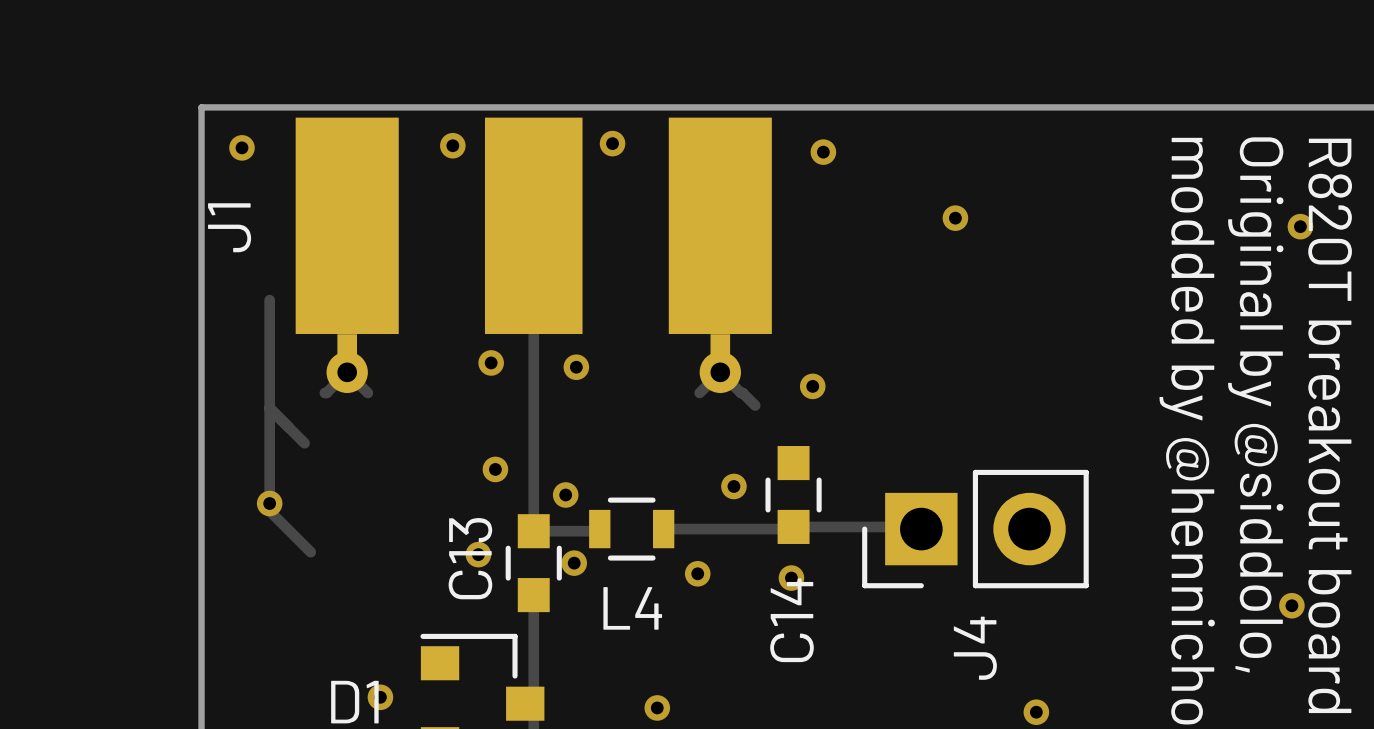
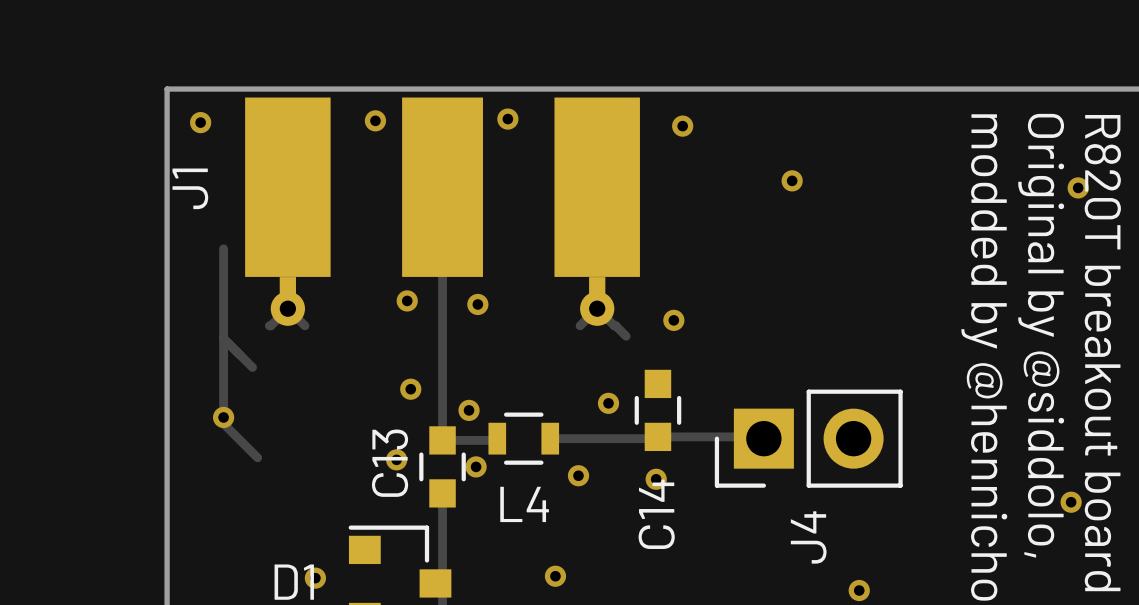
via position: (657, 707) -> (555, 576)

